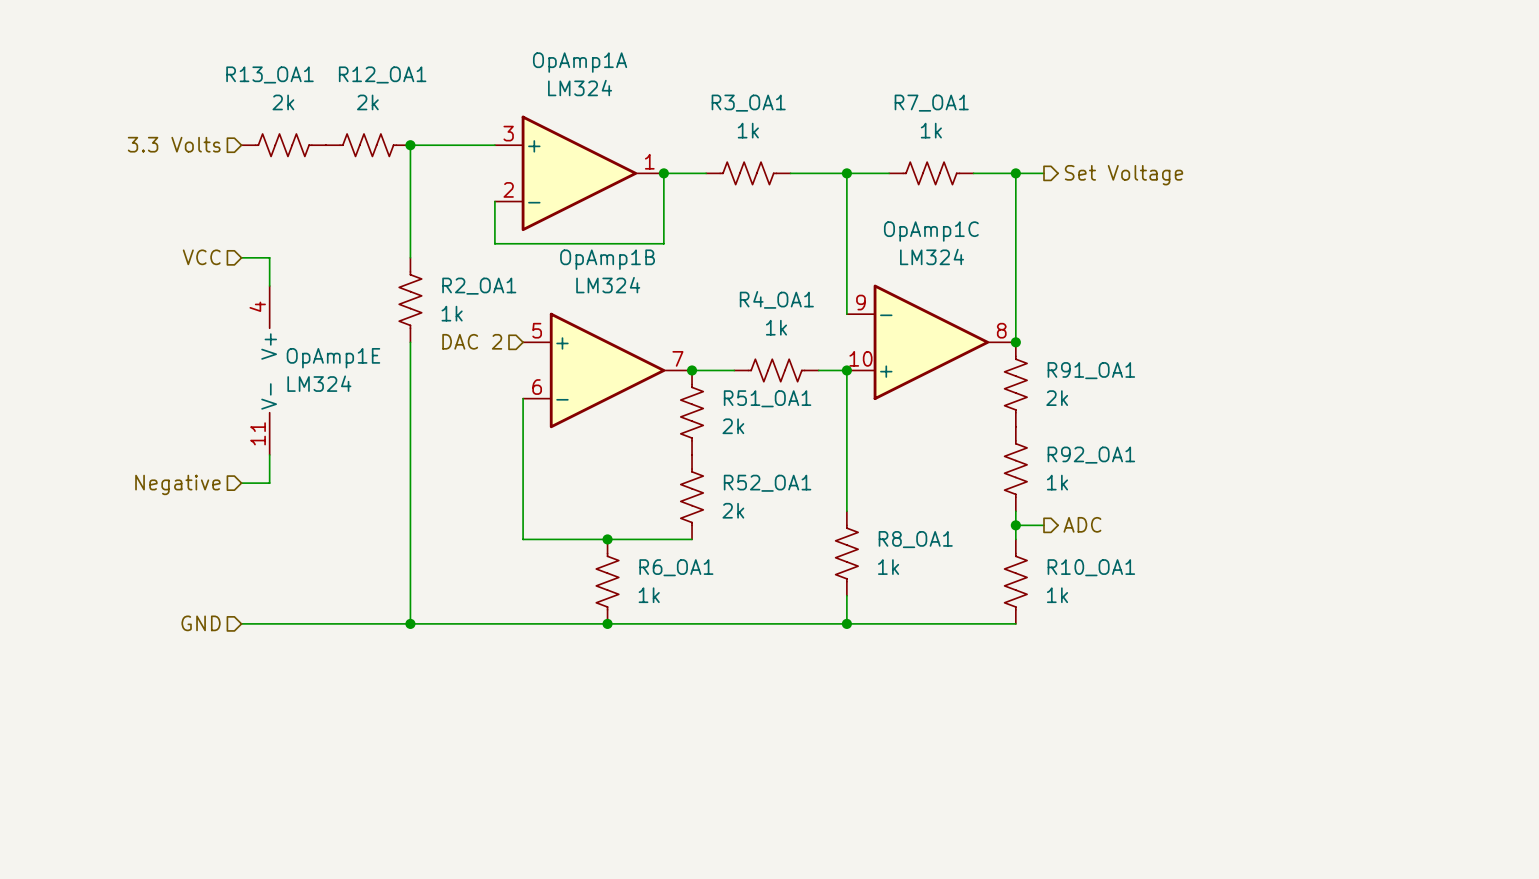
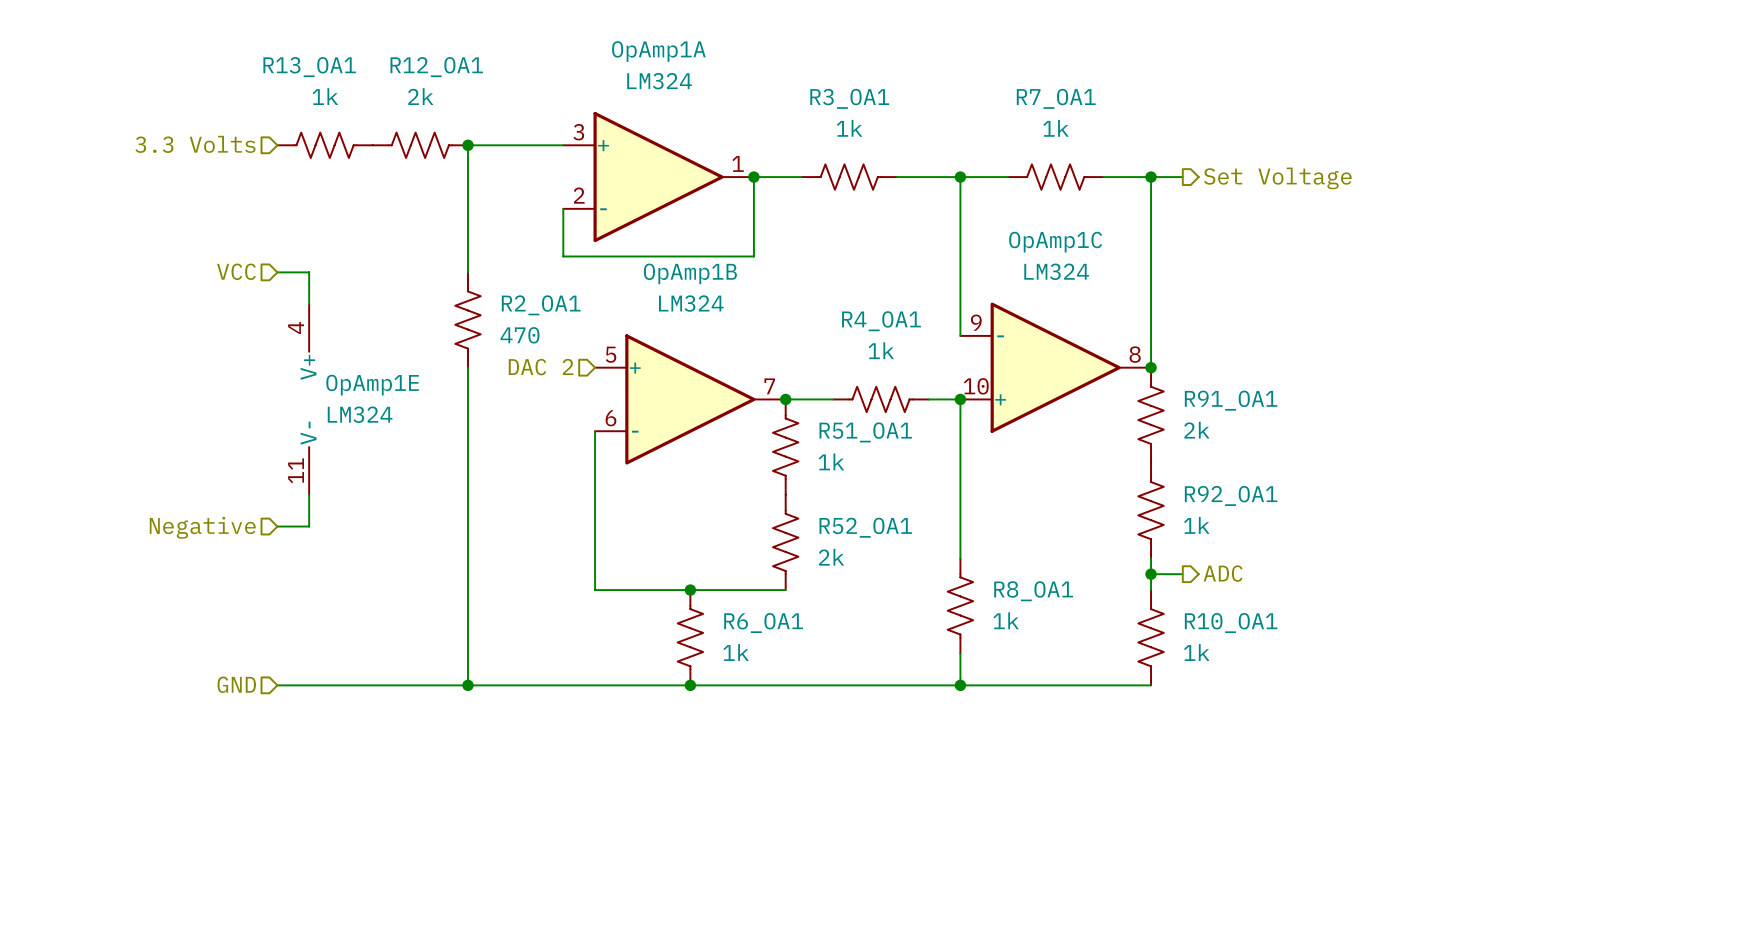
R13_OA1 value: 2k (283, 102) -> 1k (325, 96)
R2_OA1 value: 1k (452, 313) -> 470 (520, 335)
R51_OA1 value: 2k (733, 426) -> 1k (831, 461)

